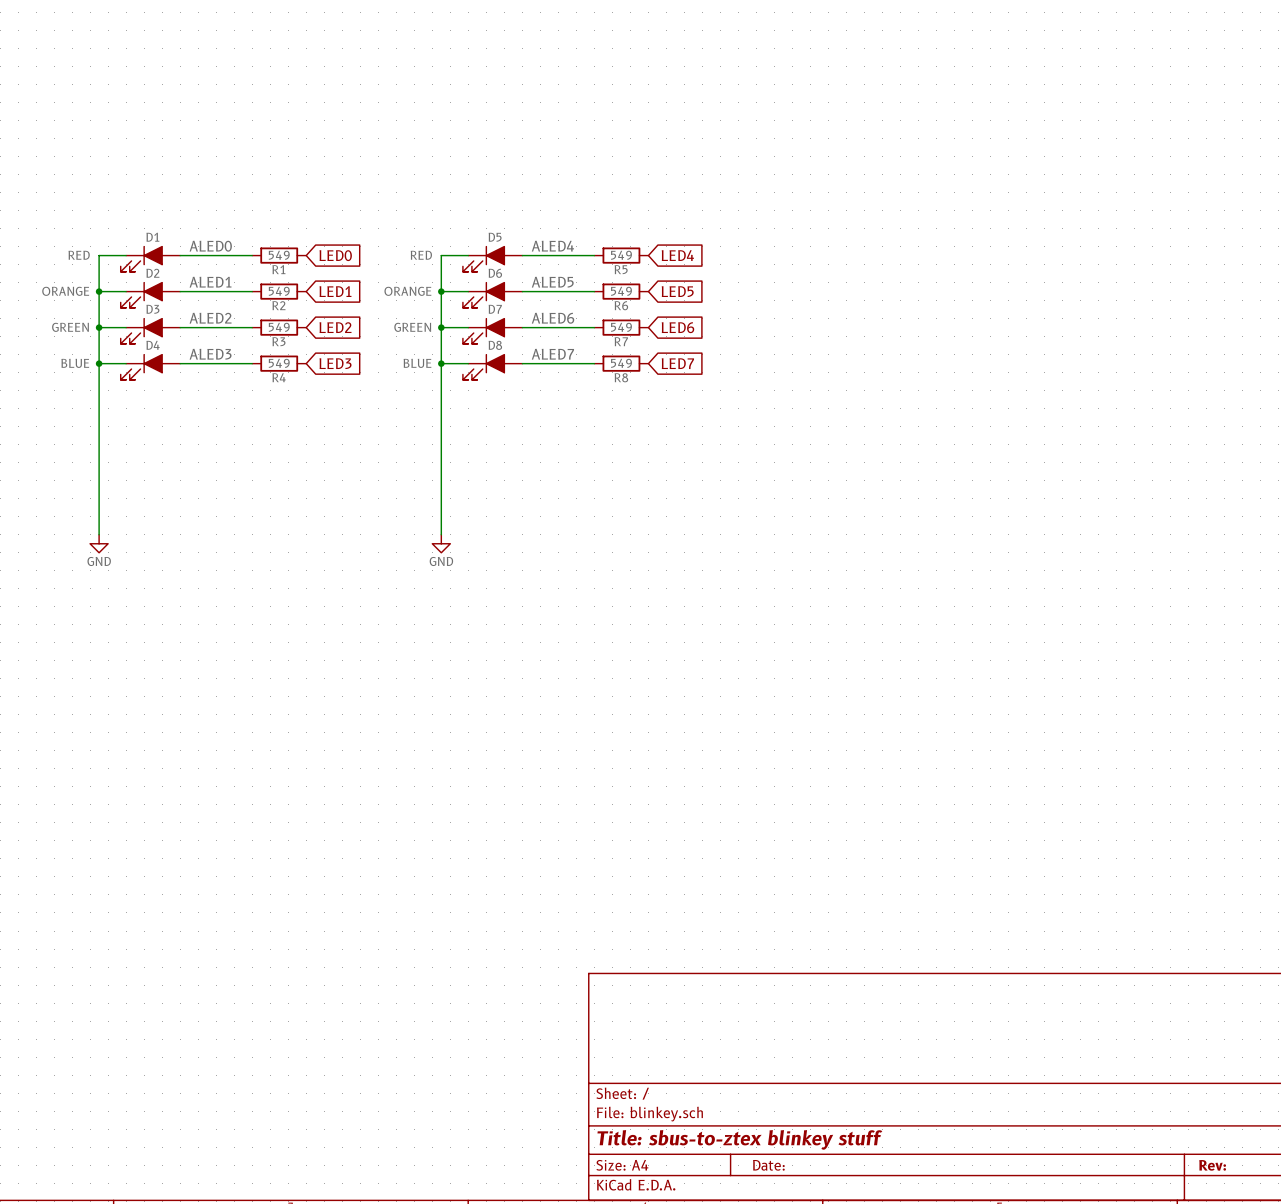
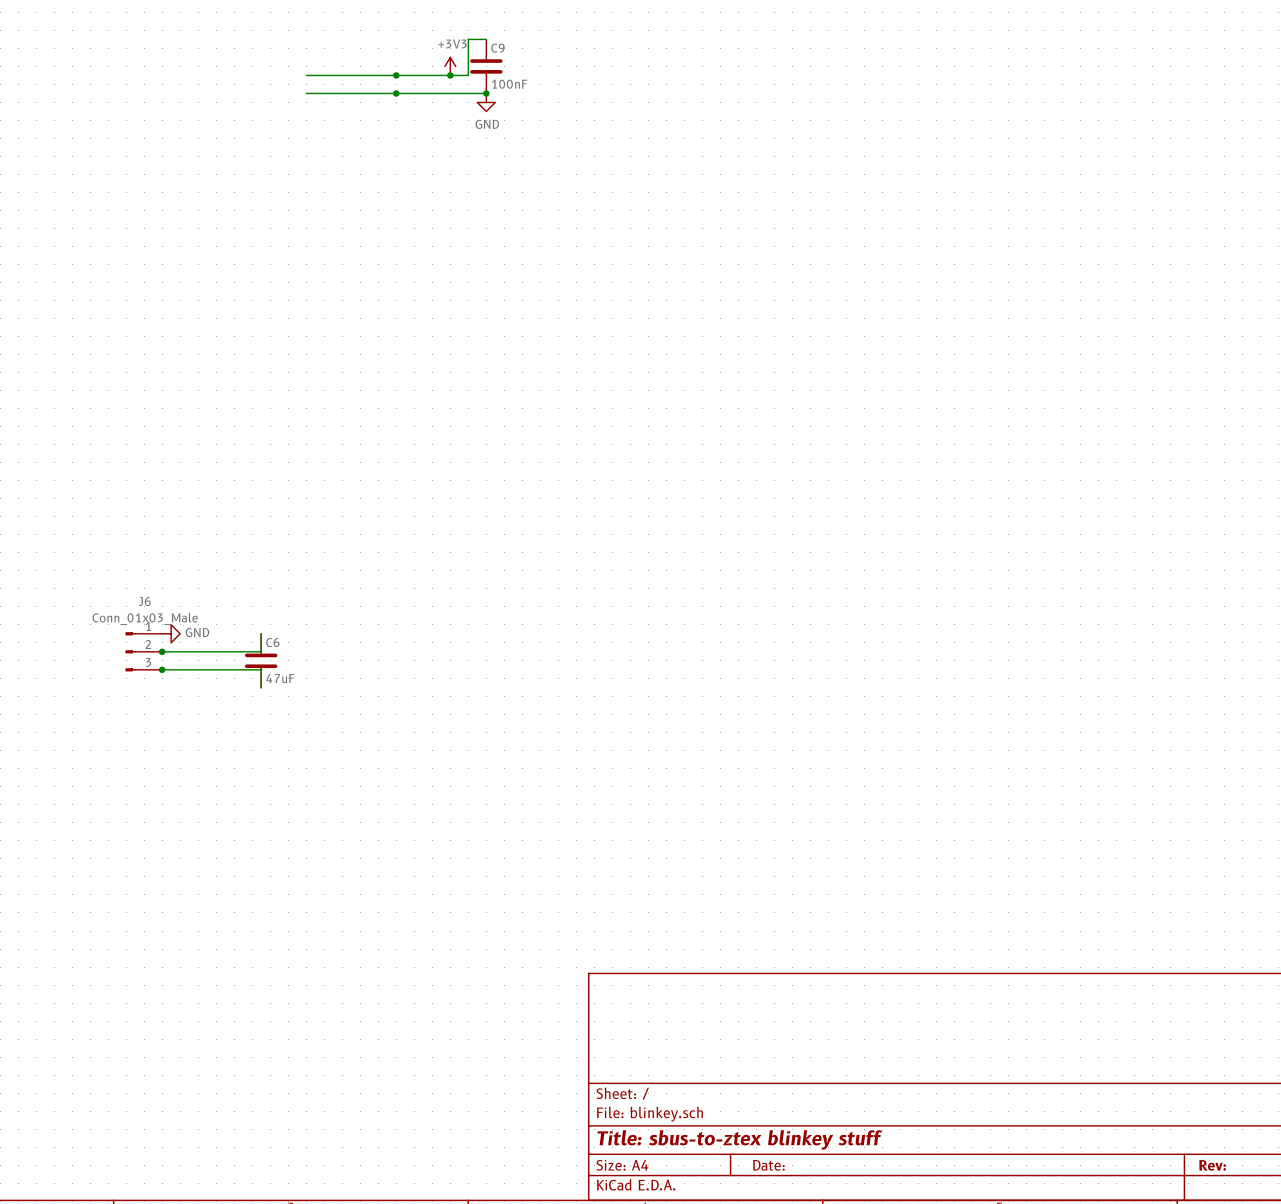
wire: none -> (486, 39) (468, 39) (468, 75) (306, 75)
power symbol: none -> +3V3 (450, 66)
C9: none -> 100nF (486, 66)
junction: none -> (396, 75)
junction: none -> (450, 75)
wire: none -> (306, 93) (486, 93)
junction: none -> (396, 93)
junction: none -> (486, 93)
power symbol: none -> GND (486, 102)
label: ALED0 (210, 246) -> none
label: ALED4 (552, 246) -> none
wire: (126, 255) (99, 255) (99, 534) -> none
wire: (180, 255) (252, 255) -> none
R1: 549 (279, 255) -> none
global label: LED0 (335, 255) -> none
wire: (468, 255) (441, 255) (441, 534) -> none
wire: (522, 255) (594, 255) -> none
R5: 549 (621, 255) -> none
global label: LED4 (677, 255) -> none
D1: RED (150, 258) -> none
D5: RED (492, 258) -> none
label: ALED1 (210, 282) -> none
label: ALED5 (552, 282) -> none
wire: (99, 291) (126, 291) -> none
junction: (99, 291) -> none
wire: (180, 291) (252, 291) -> none
R2: 549 (279, 291) -> none
global label: LED1 (335, 291) -> none
wire: (441, 291) (468, 291) -> none
junction: (441, 291) -> none
wire: (522, 291) (594, 291) -> none
R6: 549 (621, 291) -> none
global label: LED5 (677, 291) -> none
D2: ORANGE (150, 294) -> none
D6: ORANGE (492, 294) -> none
label: ALED2 (210, 318) -> none
label: ALED6 (553, 318) -> none
wire: (99, 327) (126, 327) -> none
junction: (99, 327) -> none
wire: (180, 327) (252, 327) -> none
R3: 549 (279, 327) -> none
global label: LED2 (335, 327) -> none
wire: (441, 327) (468, 327) -> none
junction: (441, 327) -> none
wire: (522, 327) (594, 327) -> none
R7: 549 (621, 327) -> none
global label: LED6 (677, 327) -> none
D3: GREEN (150, 330) -> none
D7: GREEN (492, 330) -> none
label: ALED3 (210, 354) -> none
label: ALED7 (552, 354) -> none
wire: (99, 363) (126, 363) -> none
junction: (99, 363) -> none
wire: (180, 363) (252, 363) -> none
R4: 549 (279, 363) -> none
global label: LED3 (335, 363) -> none
wire: (441, 363) (468, 363) -> none
junction: (441, 363) -> none
wire: (522, 363) (594, 363) -> none
R8: 549 (621, 363) -> none
global label: LED7 (677, 363) -> none
D4: BLUE (150, 366) -> none
D8: BLUE (492, 366) -> none
power symbol rotation: 0° (99, 543) -> 90° counterclockwise (171, 633)
power symbol position: GND (99, 543) -> GND (171, 633)
power symbol: GND (441, 543) -> none
wire: none -> (261, 633) (261, 651) (162, 651)
J6: none -> Conn_01x03_Male (143, 651)
junction: none -> (162, 651)
C6: none -> 47uF (261, 660)
wire: none -> (162, 669) (261, 669) (261, 687)
junction: none -> (162, 669)

